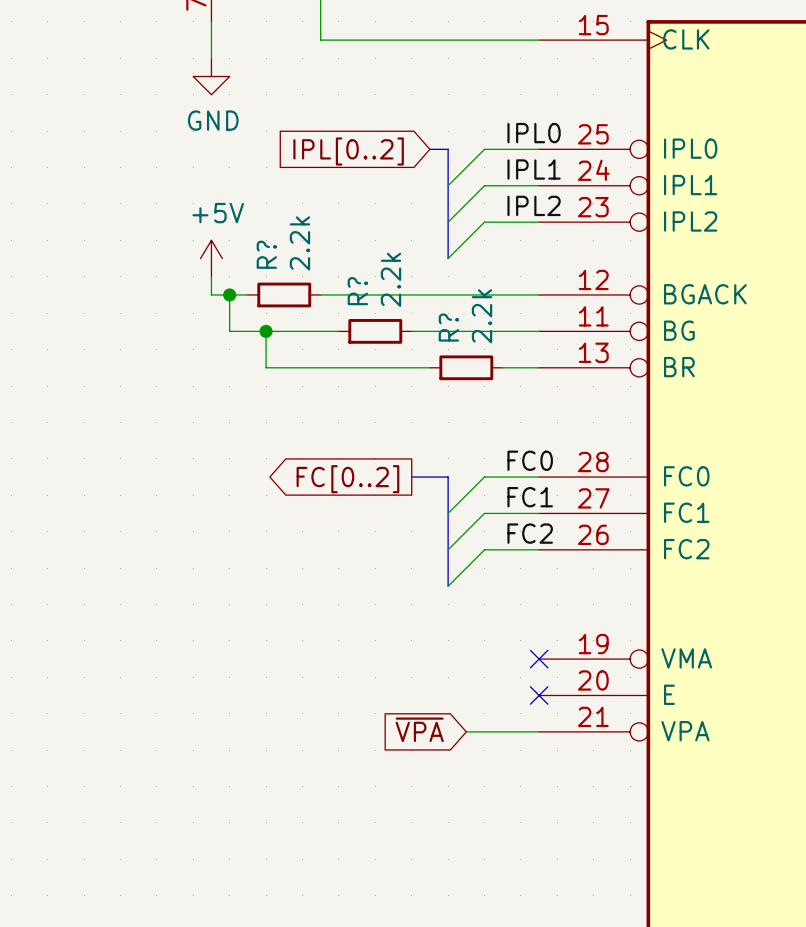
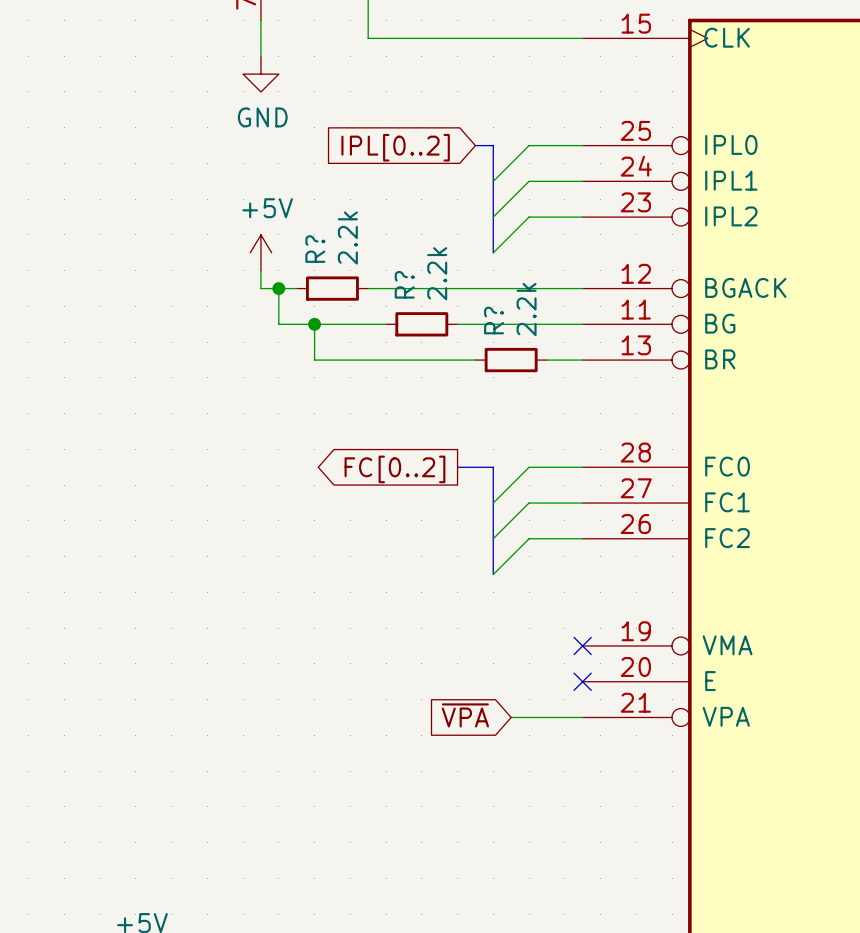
label: IPL0 (534, 133) -> none
label: IPL1 (534, 169) -> none
label: IPL2 (534, 205) -> none
label: FC0 (530, 460) -> none
label: FC1 (530, 497) -> none
label: FC2 (530, 533) -> none

